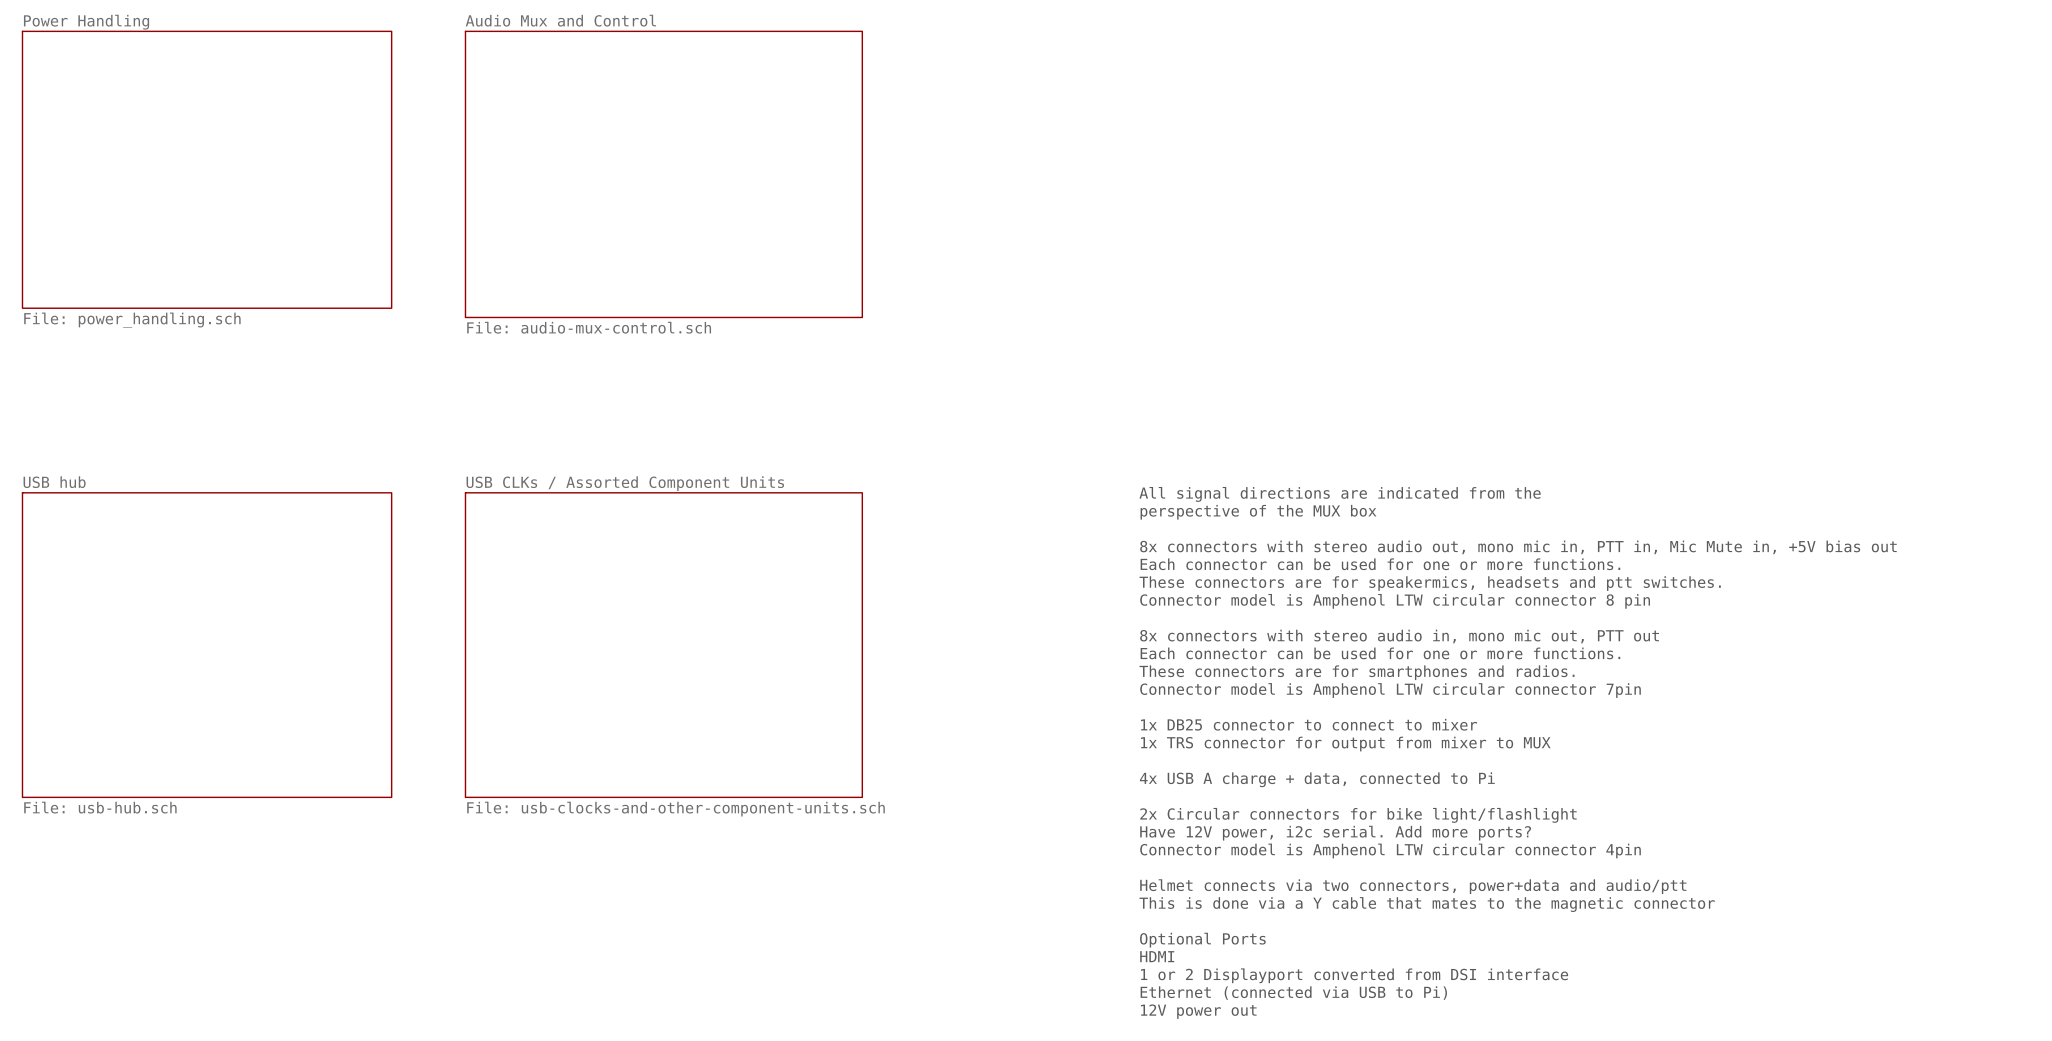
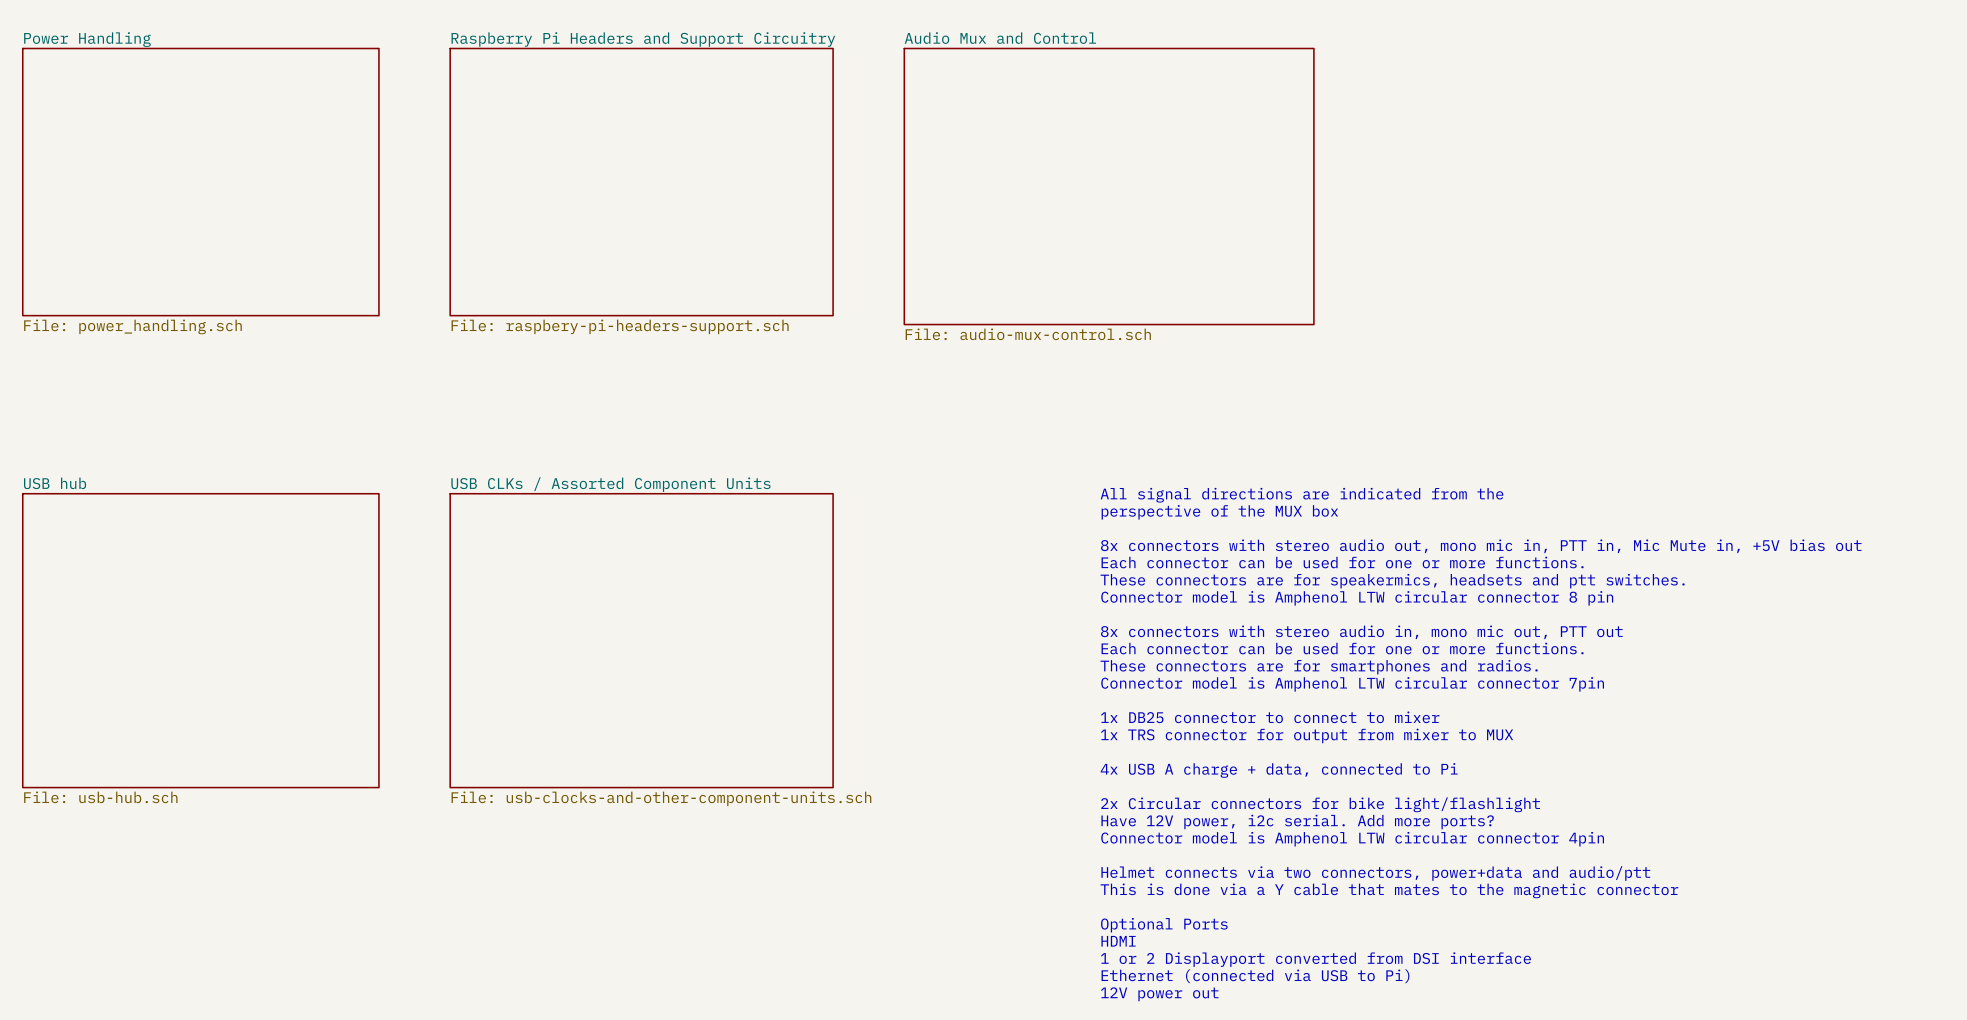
sheet Raspberry Pi Headers and Support Circuitry: none -> File: raspbery-pi-headers-support.sch (641, 182)
sheet Audio Mux and Control: File: audio-mux-control.sch (663, 174) -> none
sheet Audio Mux and Control: none -> File: audio-mux-control.sch (1109, 186)

